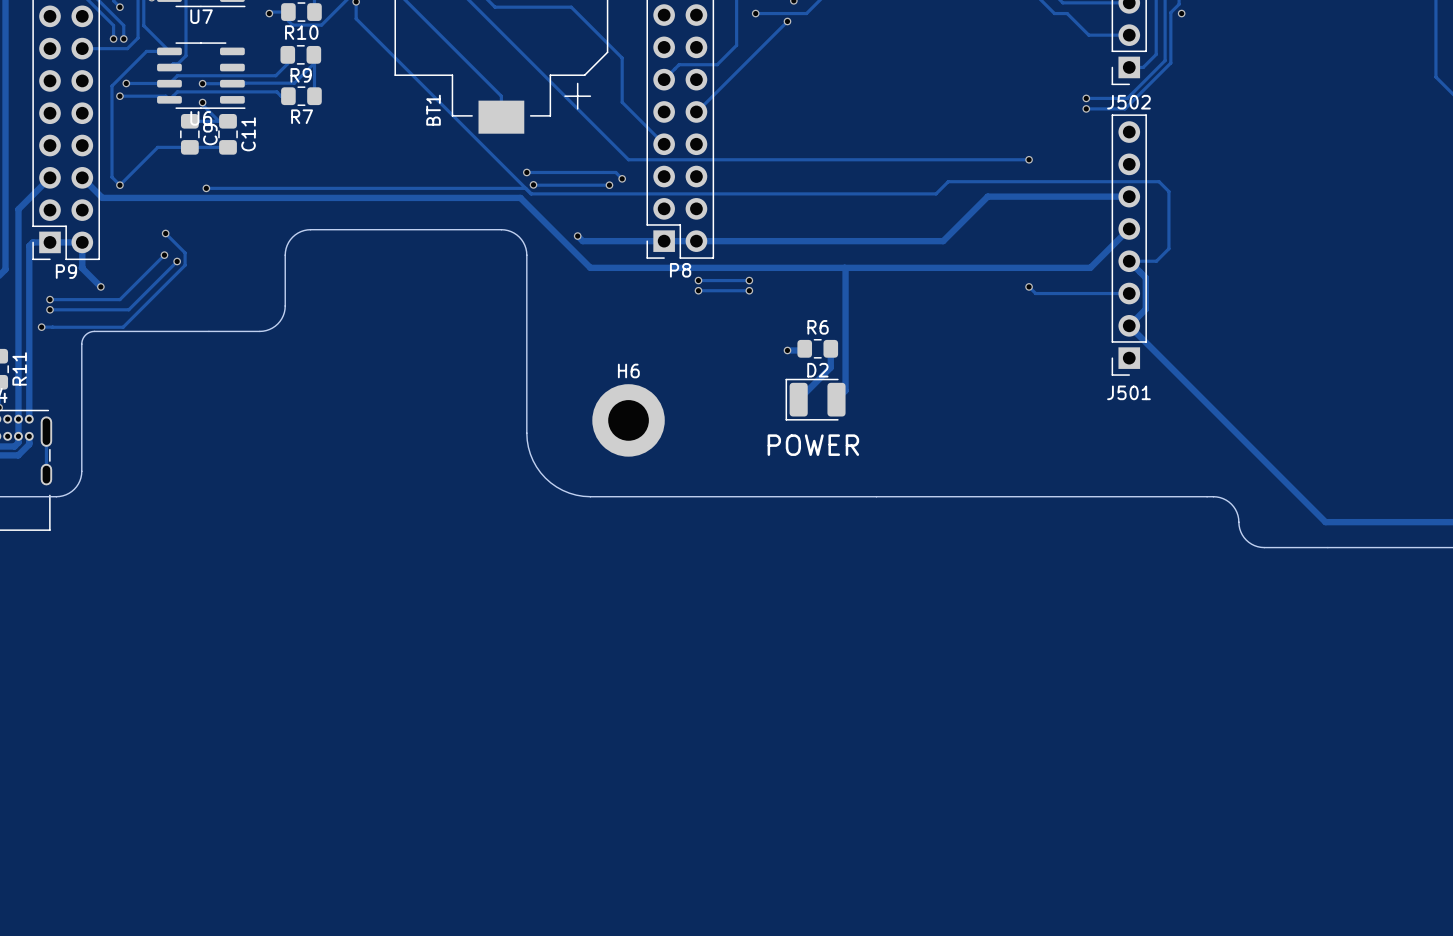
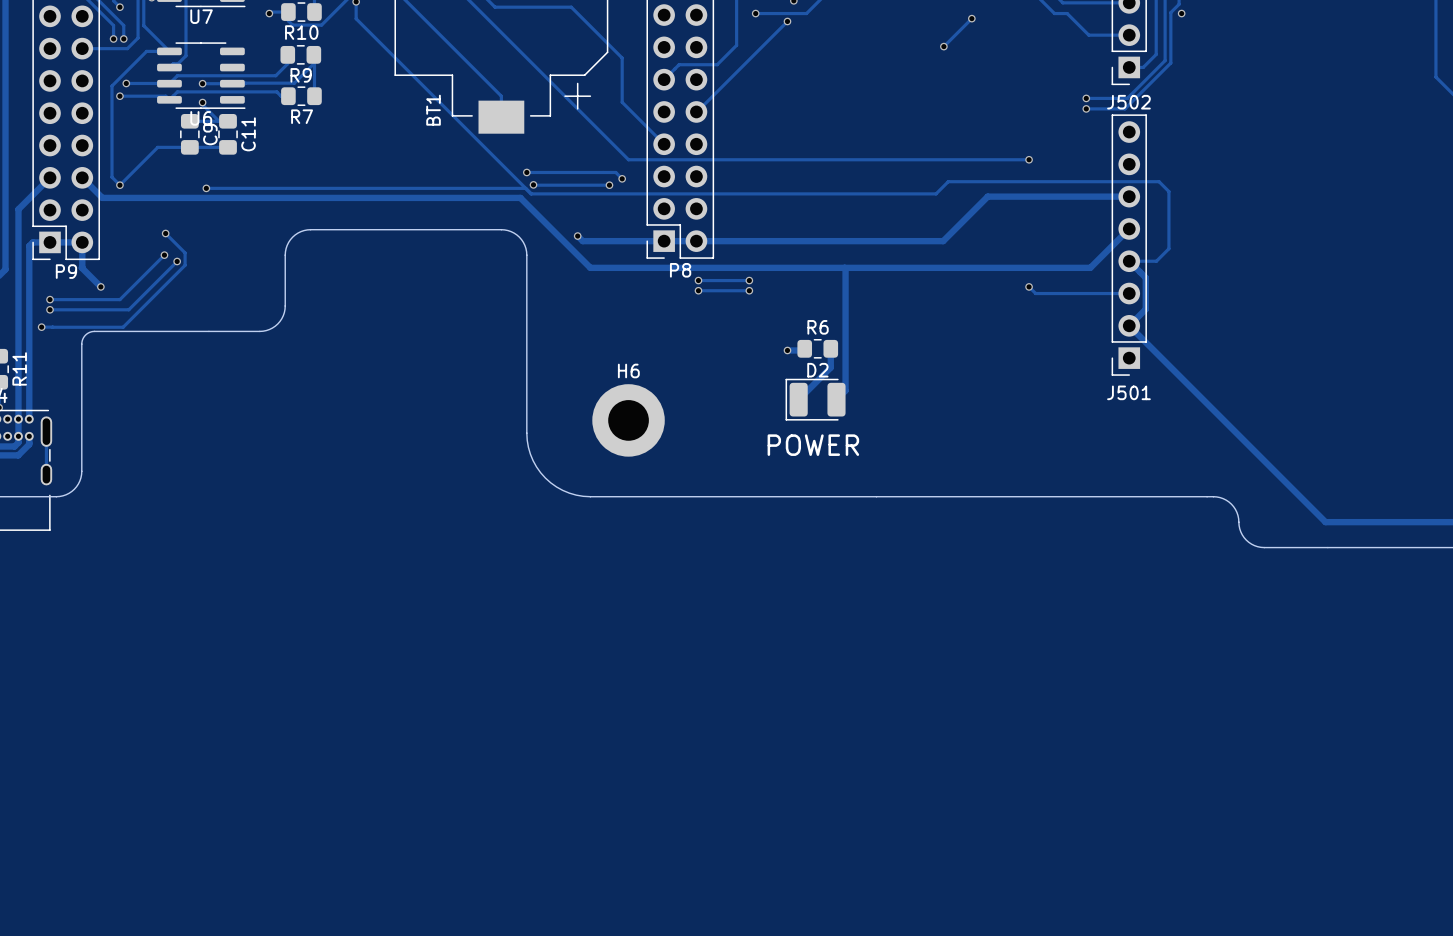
track: none -> (971, 18) (943, 46)
via: none -> (971, 18)
via: none -> (943, 46)

